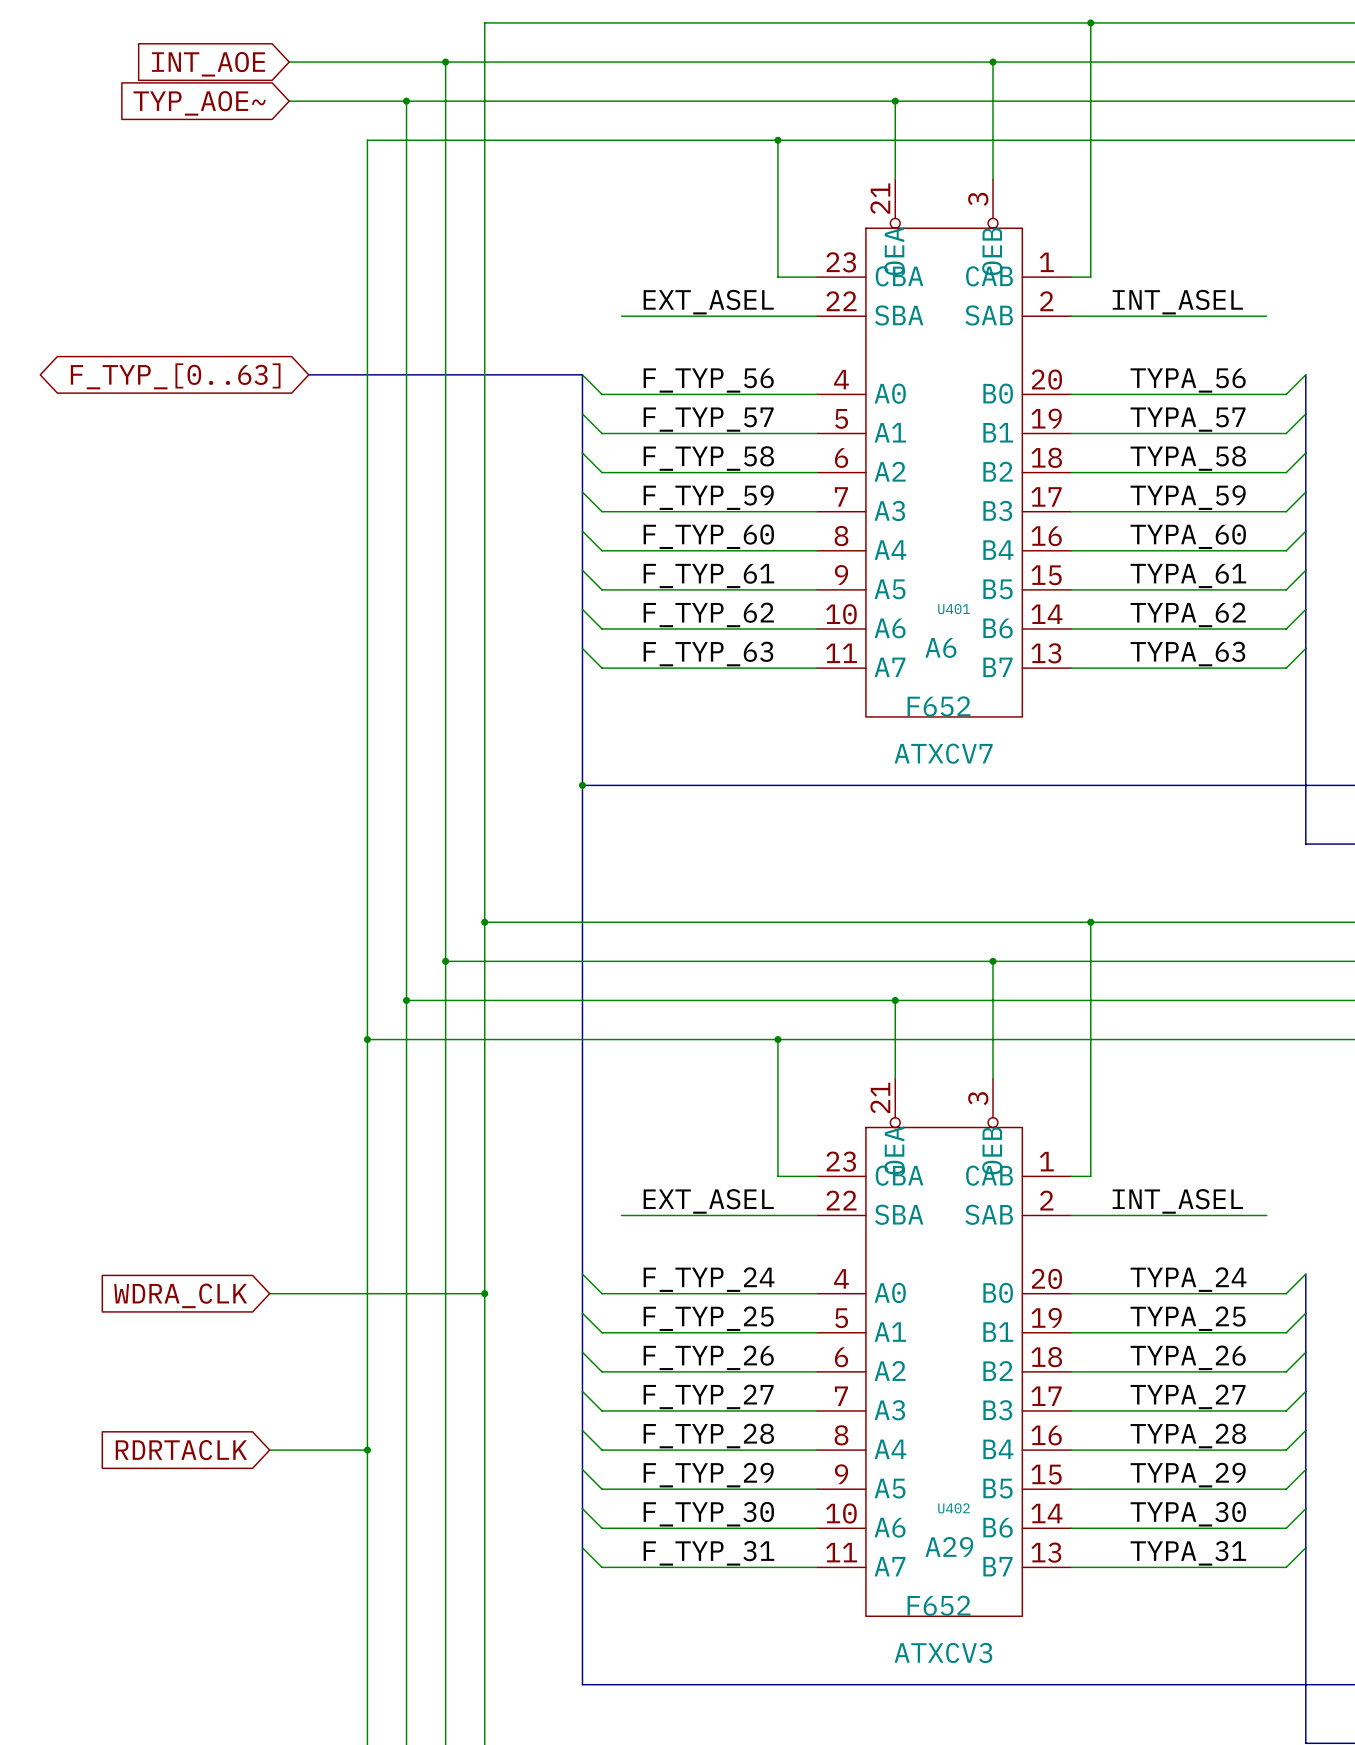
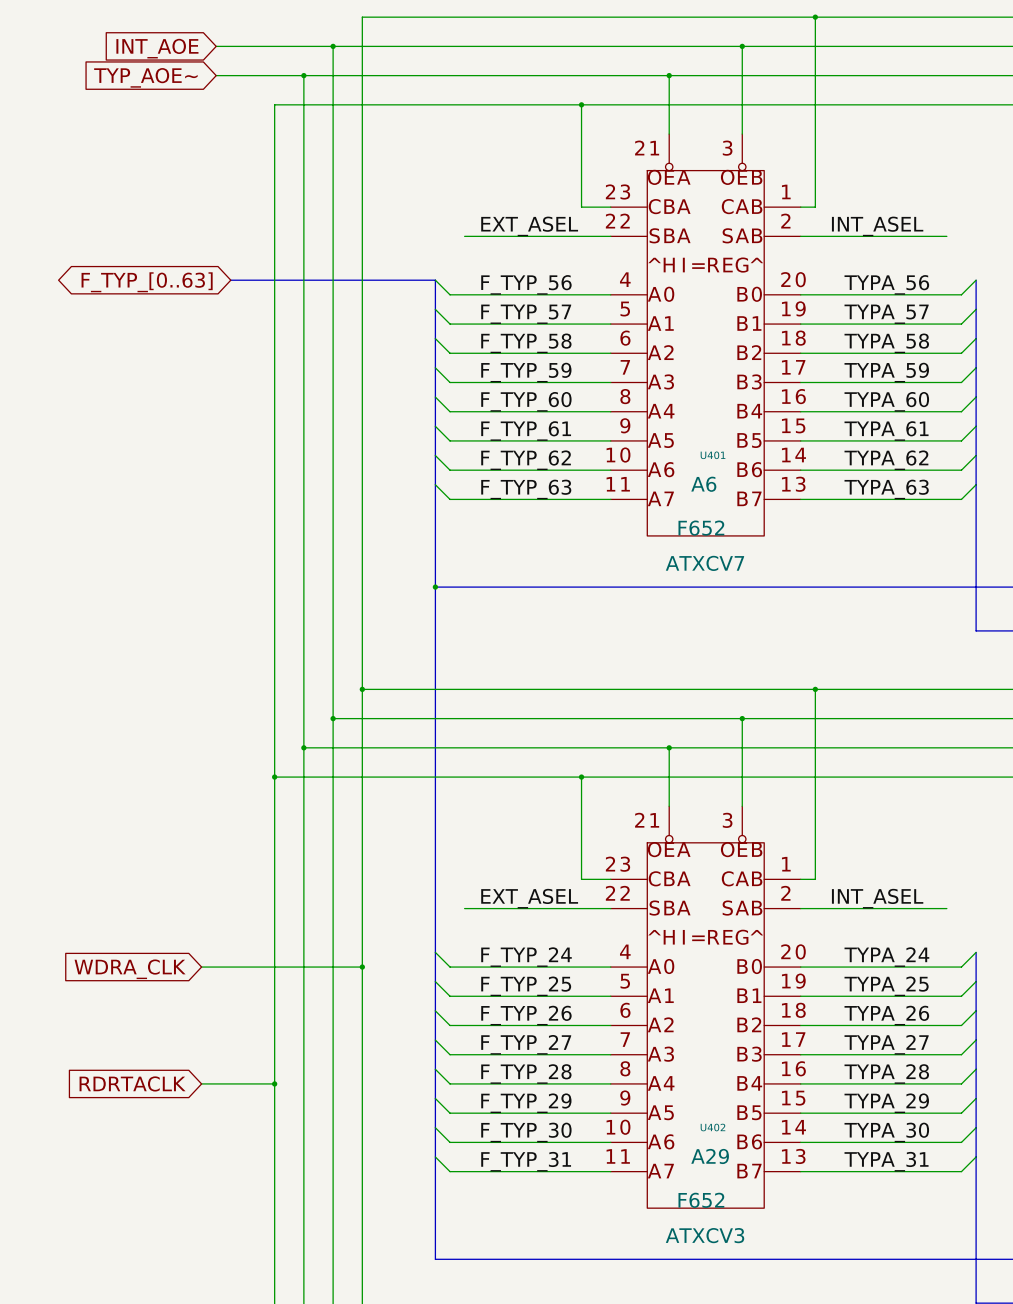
U401 symbol: [817, 179, 1072, 717] -> [610, 134, 801, 536]
U402 symbol: [817, 1078, 1072, 1617] -> [610, 806, 801, 1209]

